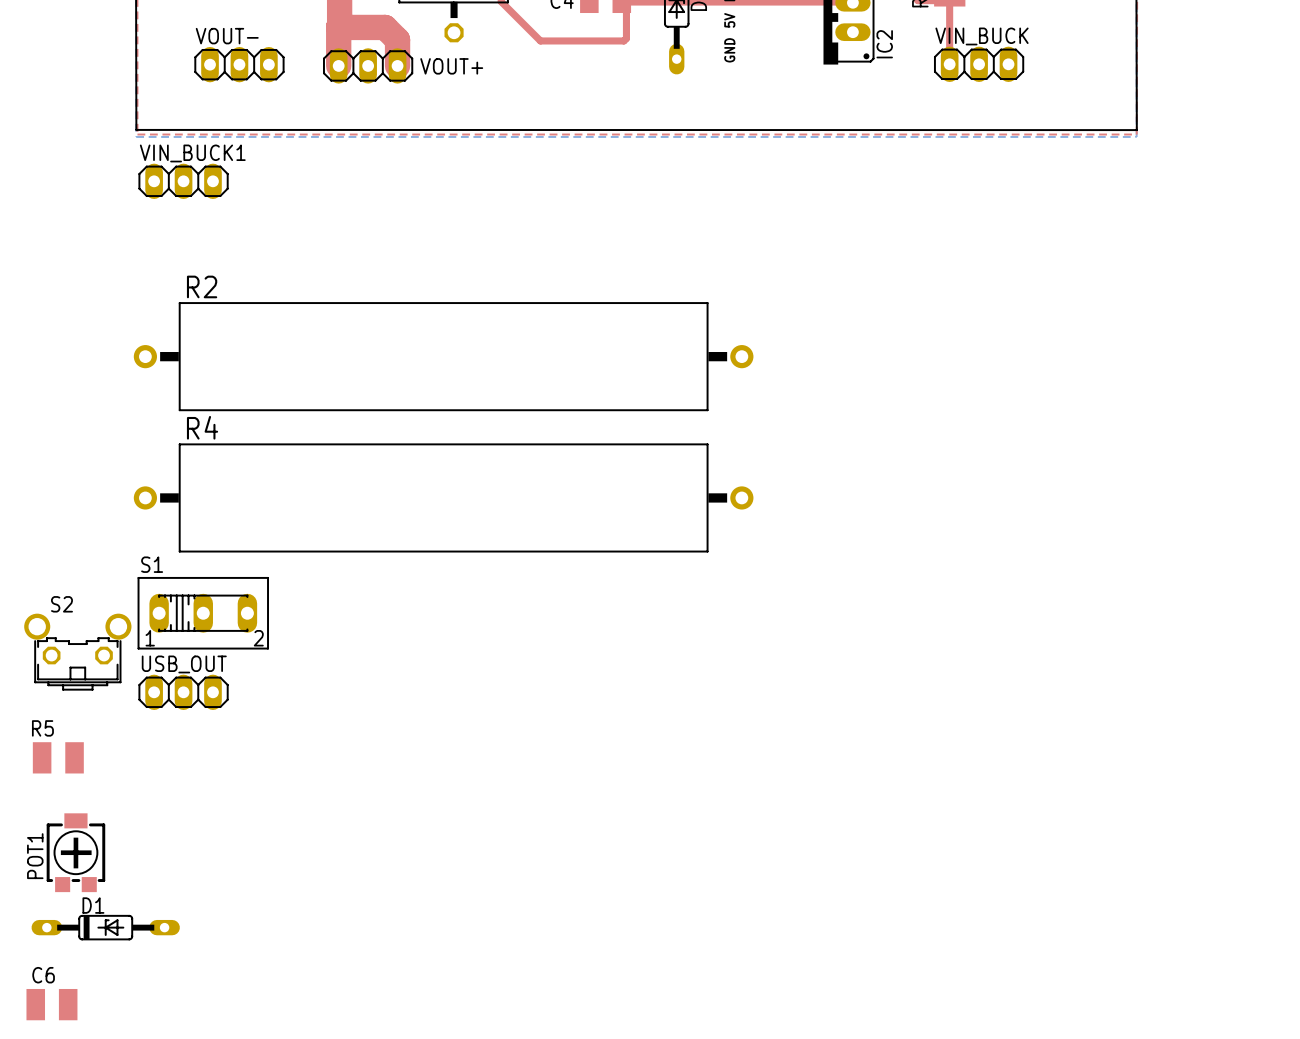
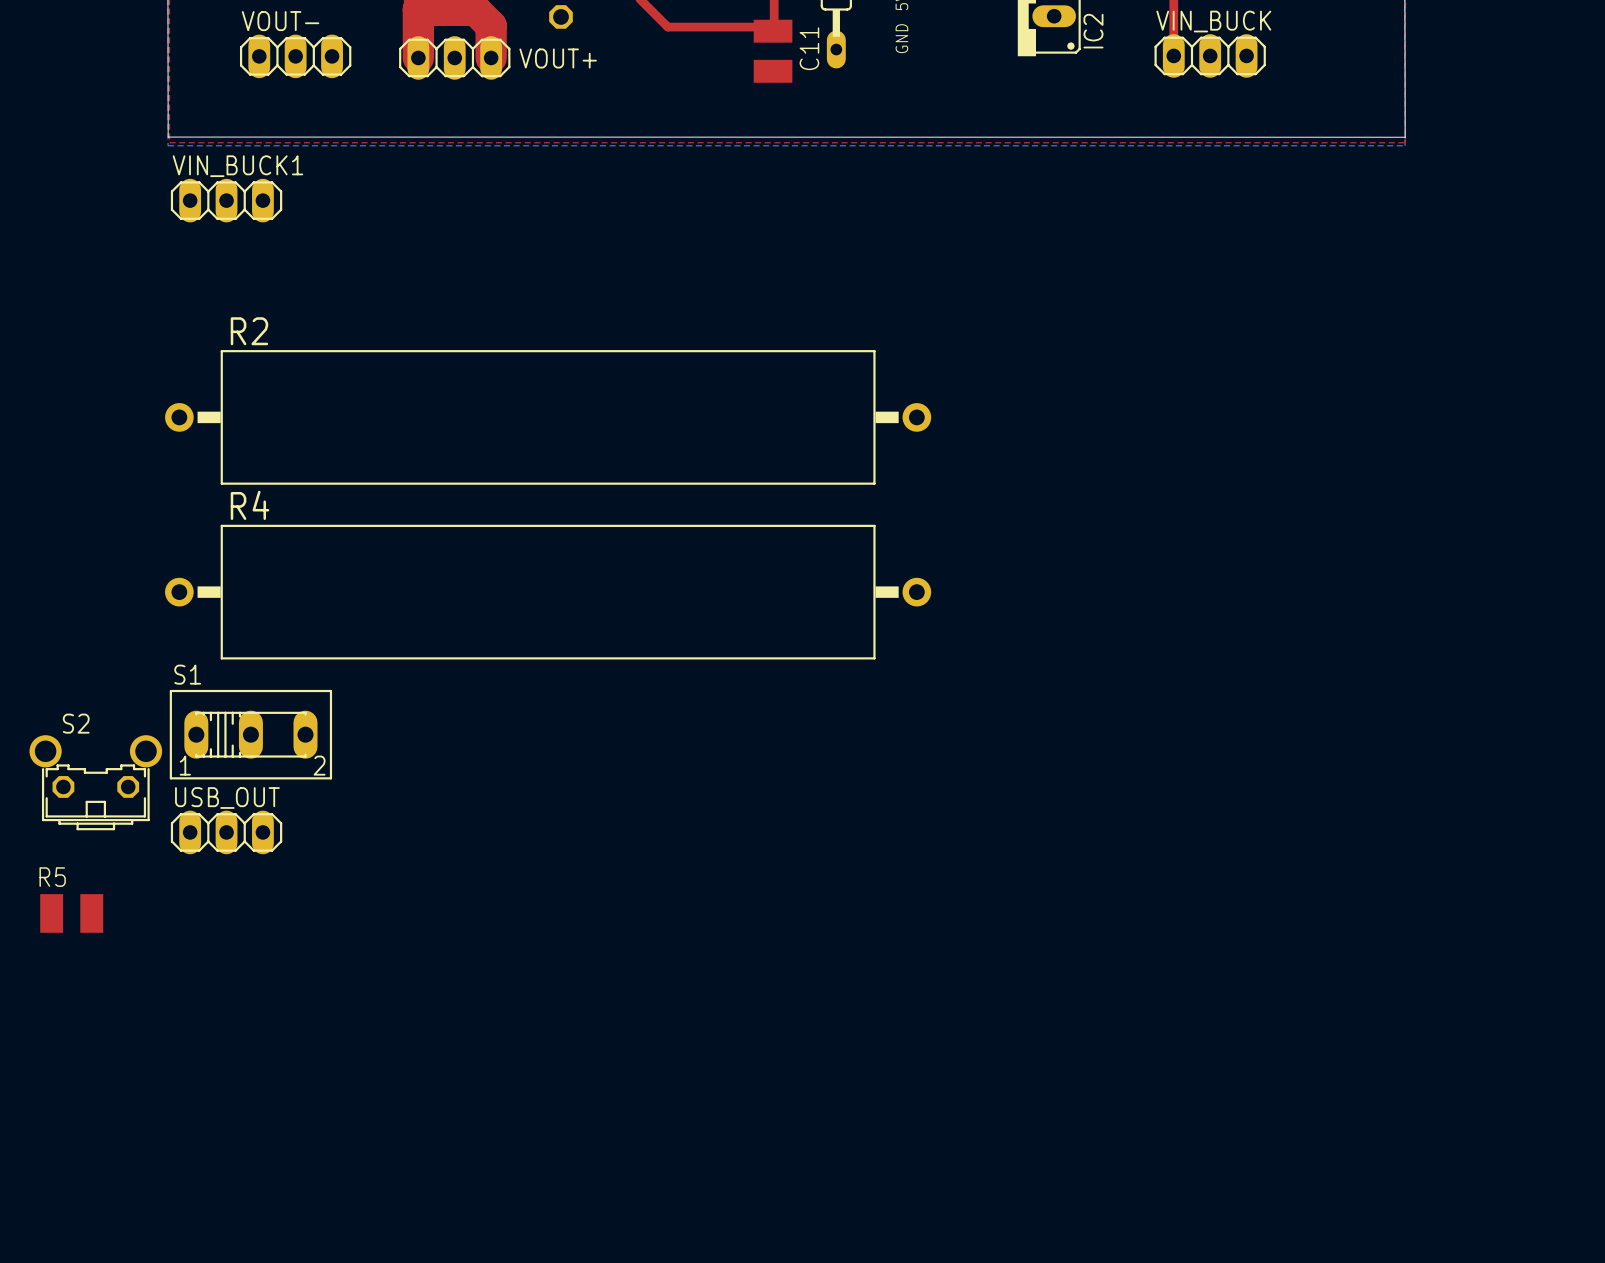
C11: none -> (773, 51)
POT1: (75, 852) -> none
D1: (105, 927) -> none
C6: (51, 1004) -> none

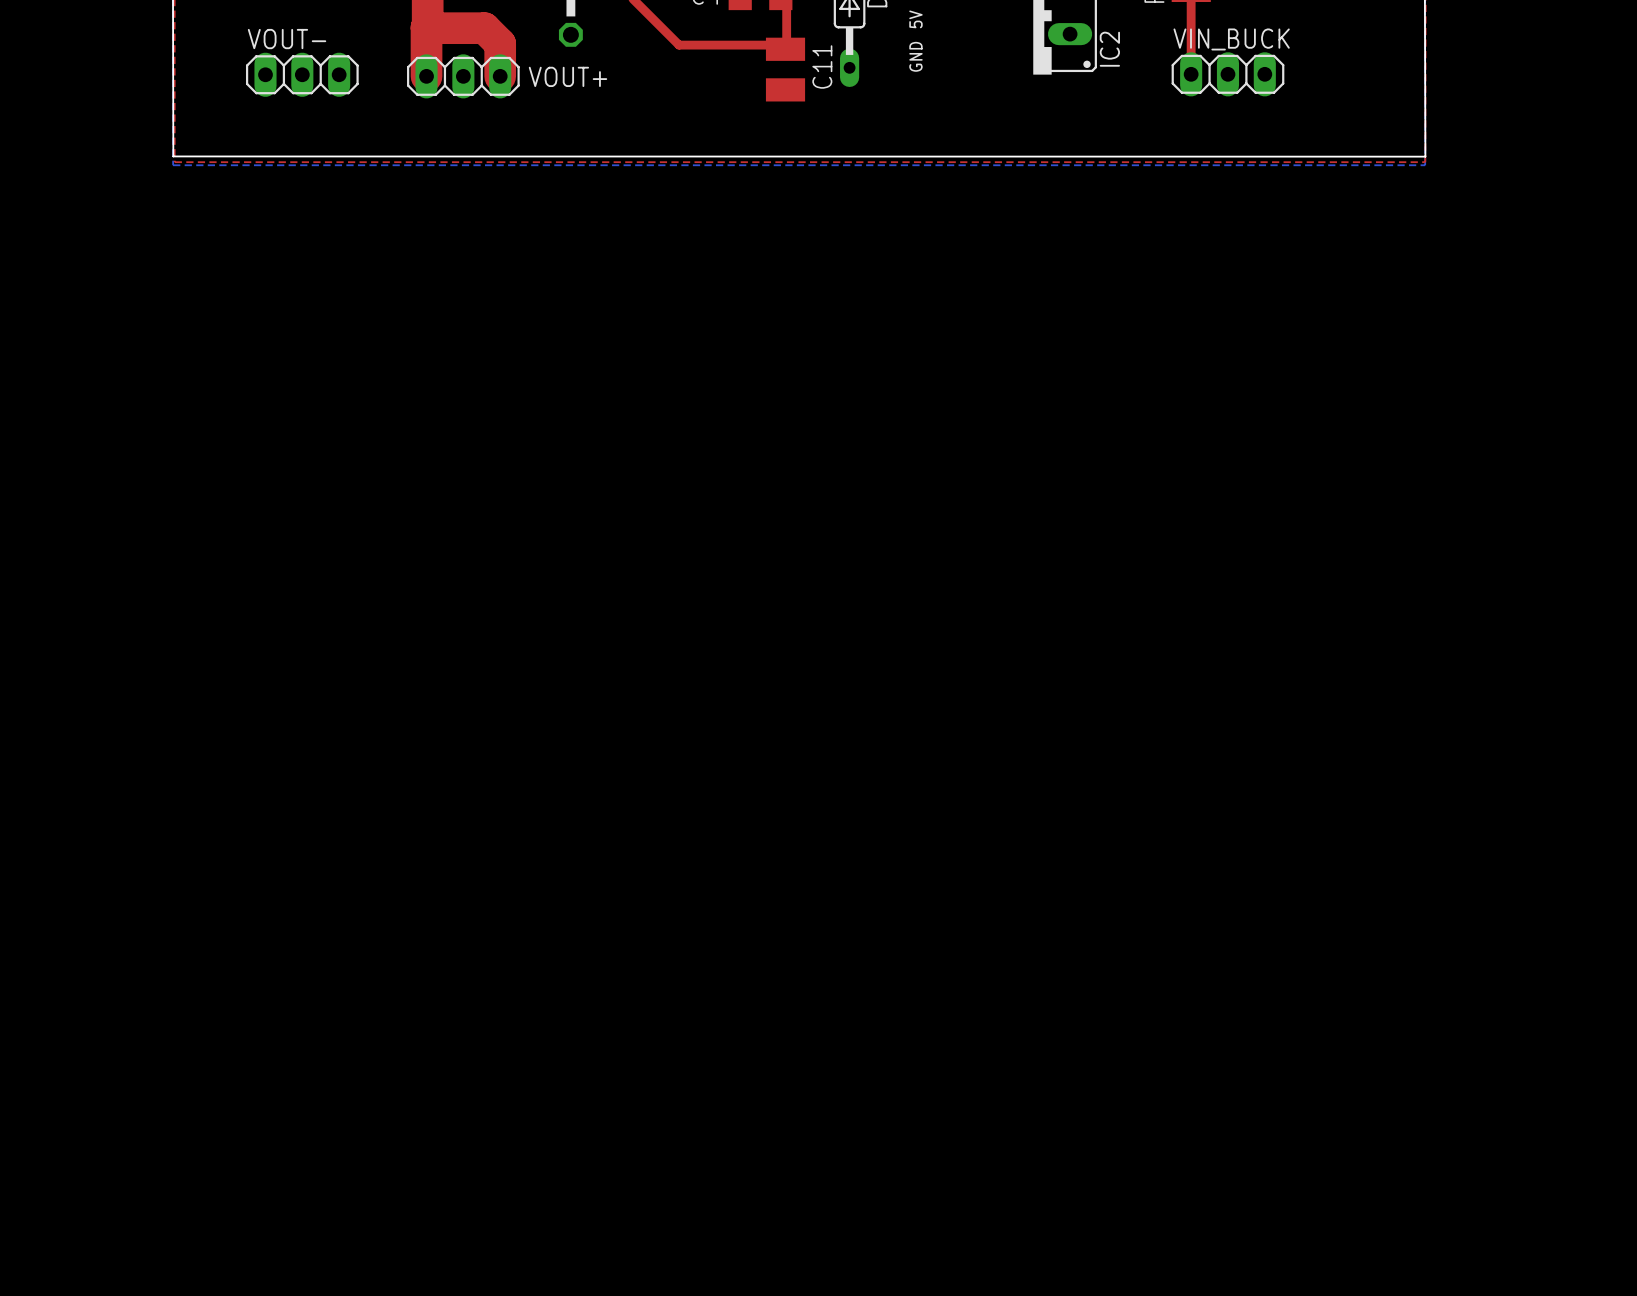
VIN_BUCK1: (226, 200) -> none
R2: (548, 417) -> none
R4: (548, 592) -> none
S1: (250, 734) -> none
S2: (95, 782) -> none
USB_OUT: (226, 832) -> none
R5: (71, 913) -> none

